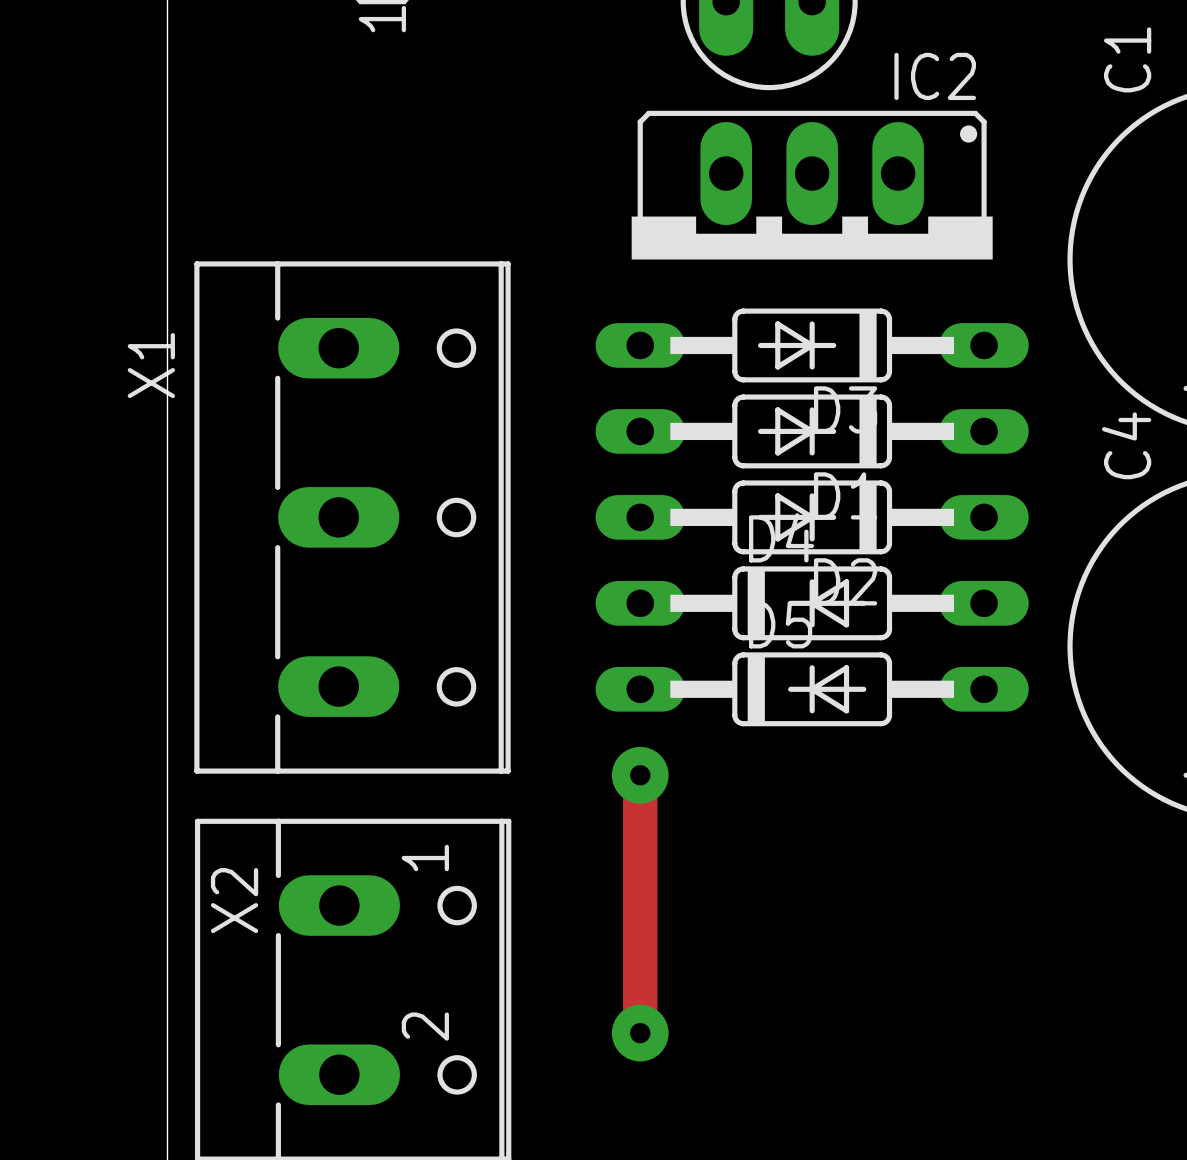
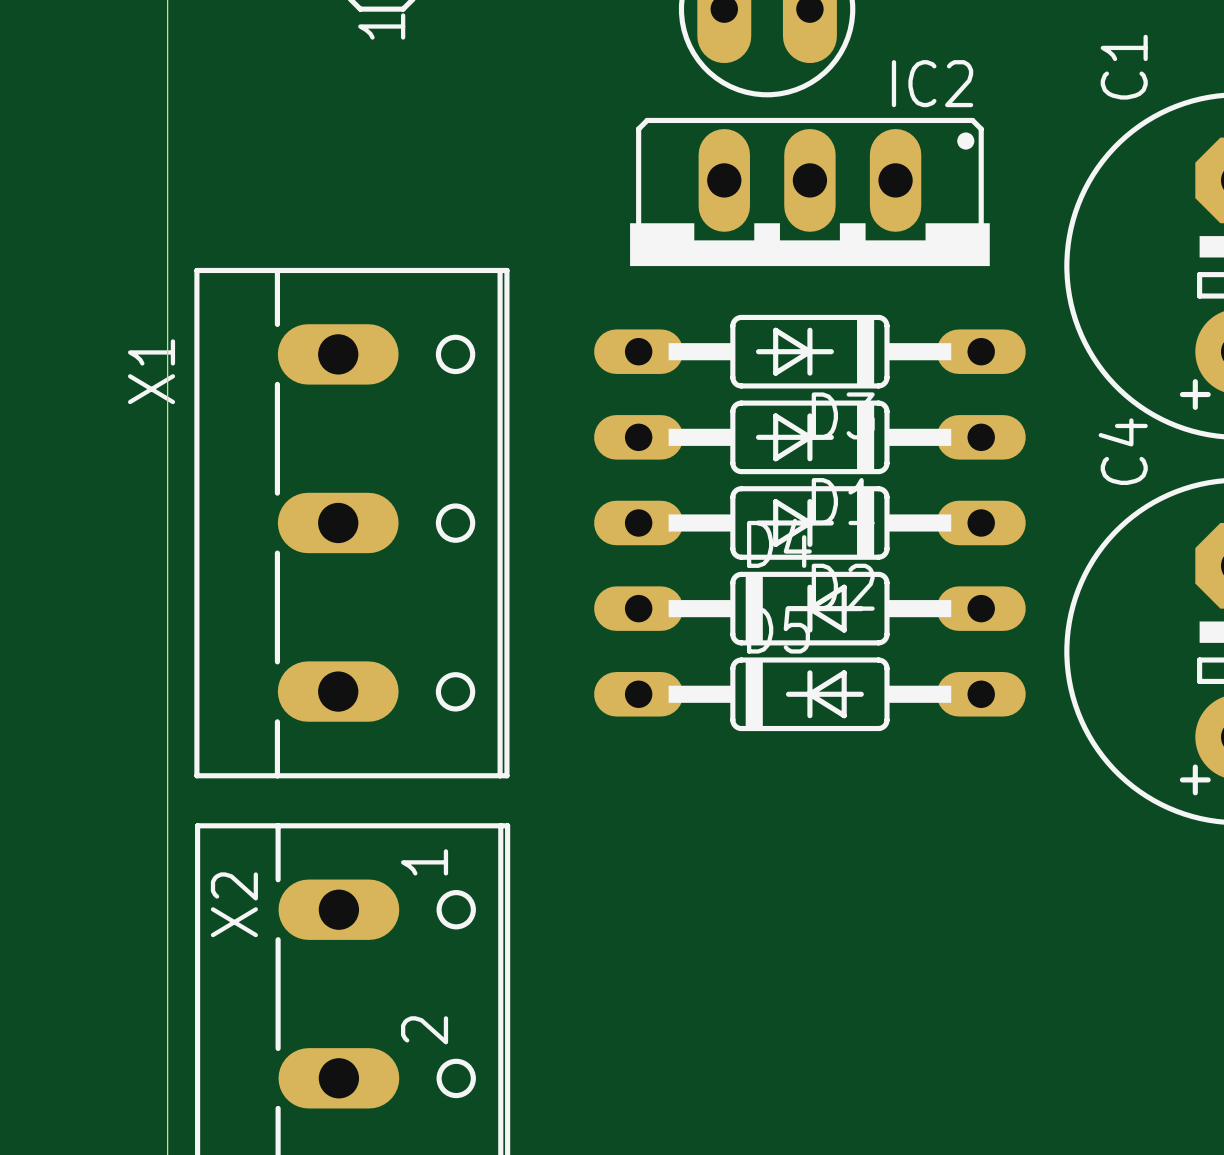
track: (640, 775) (640, 1033) -> none
via: (640, 775) -> none
via: (640, 1033) -> none

